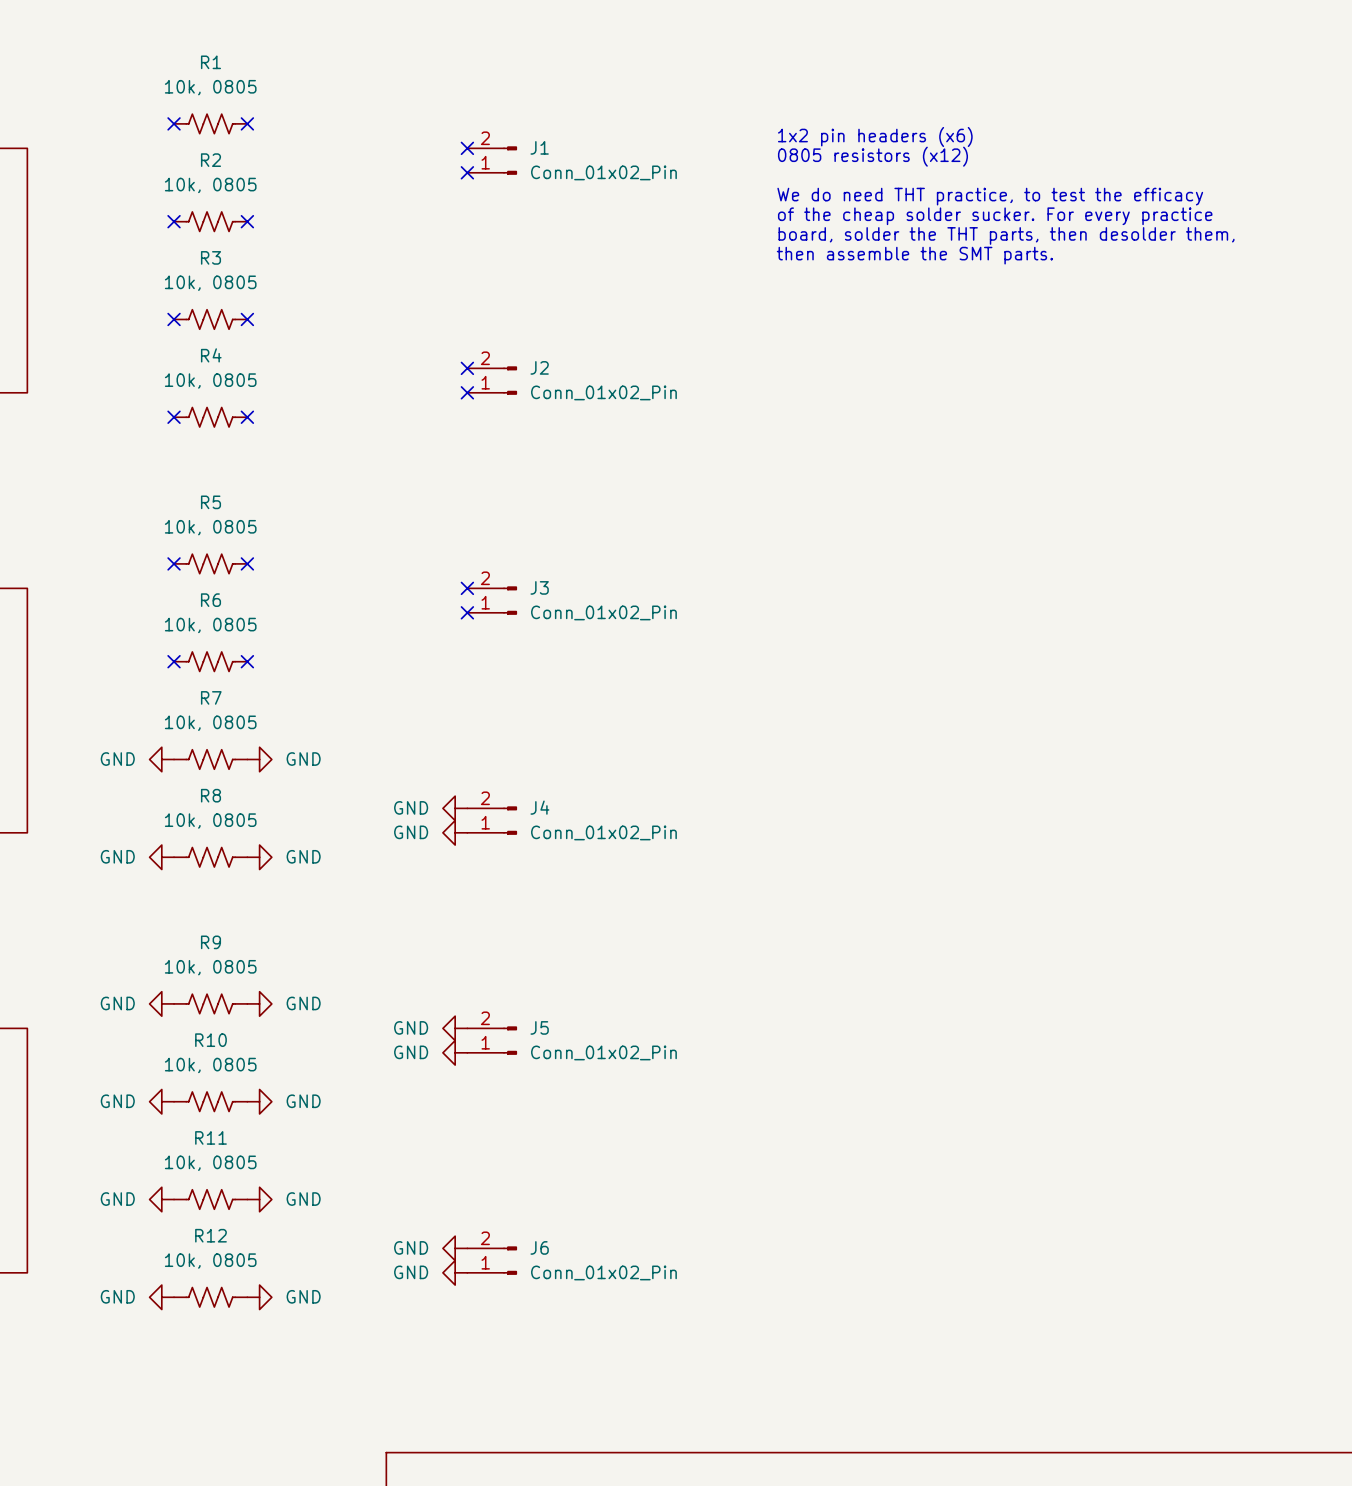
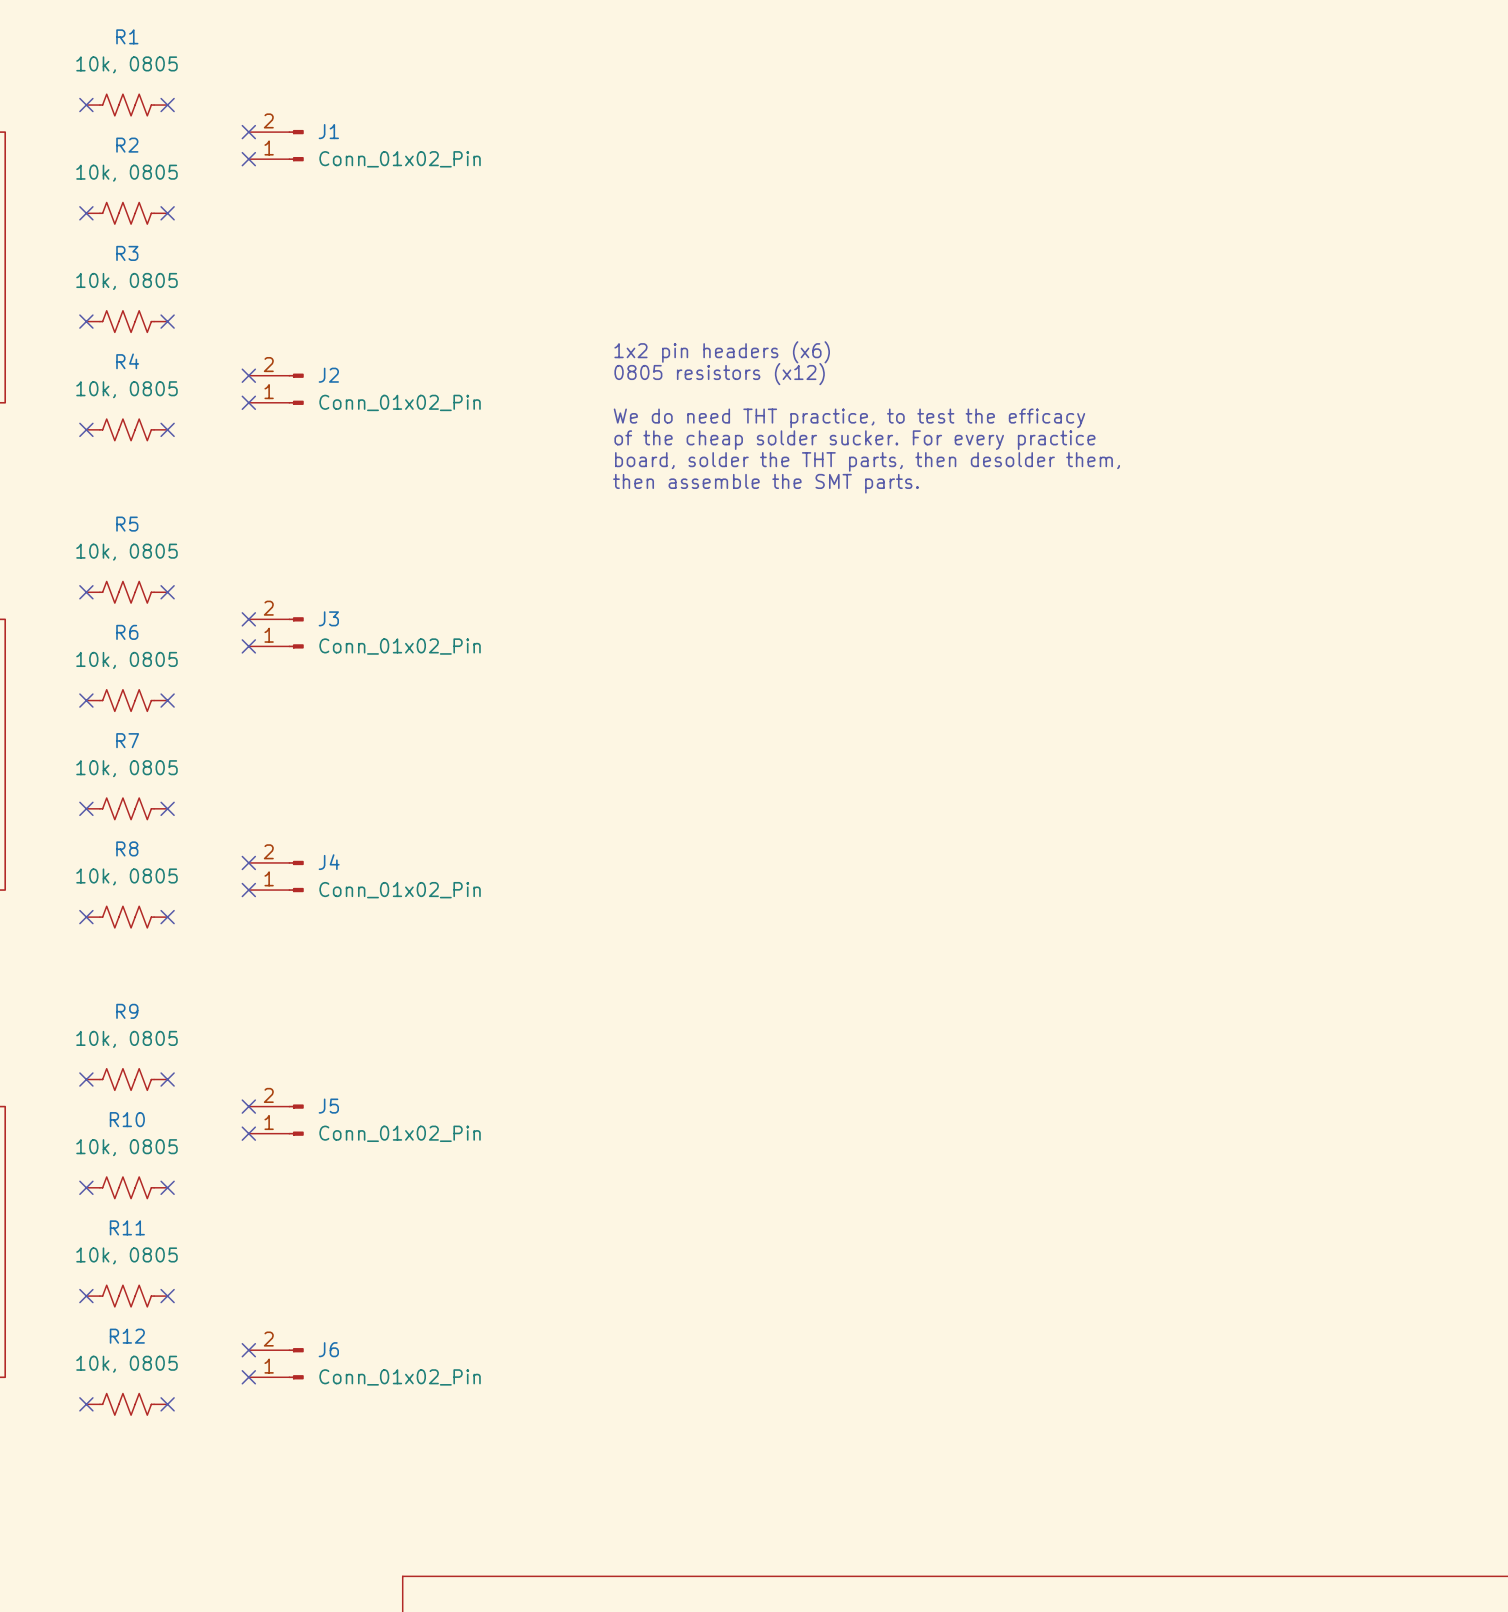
no-connect mark: none -> (86, 105)
R1 position: (210, 123) -> (127, 105)
no-connect mark: (247, 123) -> none
text: 1x2 pin headers (x6) (875, 136) -> none
no-connect mark: none -> (248, 132)
no-connect mark: (467, 148) -> none
text: 0805 resistors (x12) (872, 156) -> none
J1 position: (492, 160) -> (276, 145)
no-connect mark: none -> (248, 159)
no-connect mark: (467, 172) -> none
text: We do need THT practice, to test the efficacy (990, 196) -> none
text: of the cheap solder sucker. For every practice (995, 216) -> none
no-connect mark: none -> (86, 213)
R2 position: (210, 221) -> (127, 213)
no-connect mark: (247, 221) -> none
text: board, solder the THT parts, then desolder them, (1006, 235) -> none
text: then assemble the SMT parts. (914, 255) -> none
no-connect mark: none -> (86, 321)
R3 position: (210, 319) -> (127, 321)
no-connect mark: (247, 319) -> none
text: none -> 1x2 pin headers (x6) (722, 352)
text: none -> 0805 resistors (x12) (719, 374)
no-connect mark: none -> (248, 375)
no-connect mark: (467, 368) -> none
J2 position: (492, 380) -> (276, 389)
no-connect mark: none -> (248, 402)
no-connect mark: (467, 392) -> none
text: none -> We do need THT practice, to test the efficacy (849, 418)
no-connect mark: none -> (86, 429)
R4 position: (210, 417) -> (127, 429)
no-connect mark: (247, 417) -> none
text: none -> of the cheap solder sucker. For every practice (854, 440)
text: none -> board, solder the THT parts, then desolder them, (867, 461)
text: none -> then assemble the SMT parts. (766, 483)
no-connect mark: none -> (86, 592)
R5 position: (210, 563) -> (127, 592)
no-connect mark: (247, 563) -> none
no-connect mark: none -> (248, 619)
no-connect mark: (467, 588) -> none
J3 position: (492, 600) -> (276, 632)
no-connect mark: none -> (248, 646)
no-connect mark: (467, 612) -> none
no-connect mark: none -> (86, 700)
R6 position: (210, 661) -> (127, 700)
no-connect mark: (247, 661) -> none
no-connect mark: none -> (86, 808)
power symbol: GND (161, 759) -> none
no-connect mark: none -> (167, 808)
R7 position: (210, 759) -> (127, 808)
power symbol: GND (259, 759) -> none
no-connect mark: none -> (248, 862)
power symbol: GND (455, 808) -> none
J4 position: (492, 820) -> (276, 876)
no-connect mark: none -> (248, 890)
power symbol: GND (455, 832) -> none
no-connect mark: none -> (86, 917)
power symbol: GND (161, 857) -> none
no-connect mark: none -> (167, 917)
R8 position: (210, 857) -> (127, 917)
power symbol: GND (259, 857) -> none
no-connect mark: none -> (86, 1079)
power symbol: GND (161, 1003) -> none
no-connect mark: none -> (167, 1079)
R9 position: (210, 1003) -> (127, 1079)
power symbol: GND (259, 1003) -> none
no-connect mark: none -> (248, 1106)
power symbol: GND (455, 1028) -> none
J5 position: (492, 1040) -> (276, 1120)
no-connect mark: none -> (248, 1133)
power symbol: GND (455, 1052) -> none
no-connect mark: none -> (86, 1187)
power symbol: GND (161, 1101) -> none
no-connect mark: none -> (167, 1187)
R10 position: (210, 1101) -> (127, 1187)
power symbol: GND (259, 1101) -> none
no-connect mark: none -> (86, 1296)
power symbol: GND (161, 1199) -> none
no-connect mark: none -> (167, 1296)
R11 position: (210, 1199) -> (127, 1296)
power symbol: GND (259, 1199) -> none
no-connect mark: none -> (248, 1350)
power symbol: GND (455, 1248) -> none
J6 position: (492, 1260) -> (276, 1363)
no-connect mark: none -> (248, 1377)
power symbol: GND (455, 1272) -> none
no-connect mark: none -> (86, 1404)
power symbol: GND (161, 1297) -> none
no-connect mark: none -> (167, 1404)
R12 position: (210, 1297) -> (127, 1404)
power symbol: GND (259, 1297) -> none

